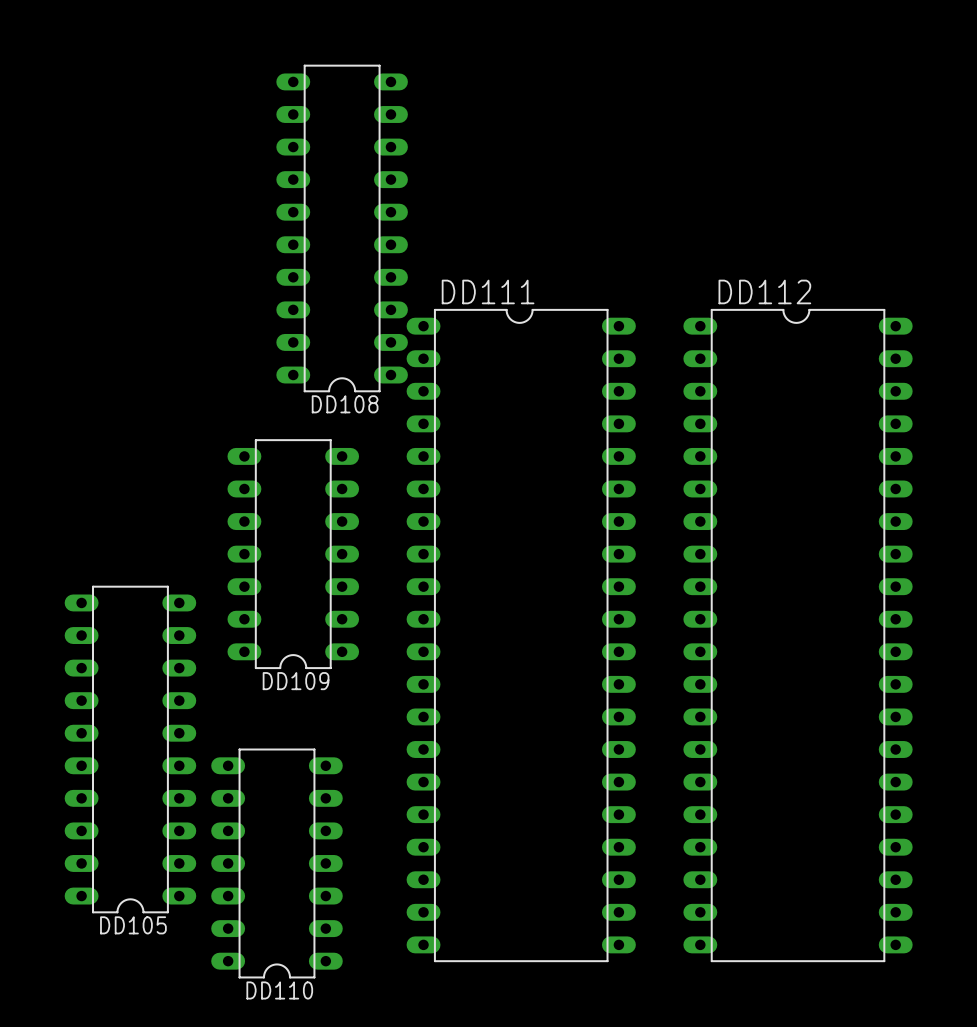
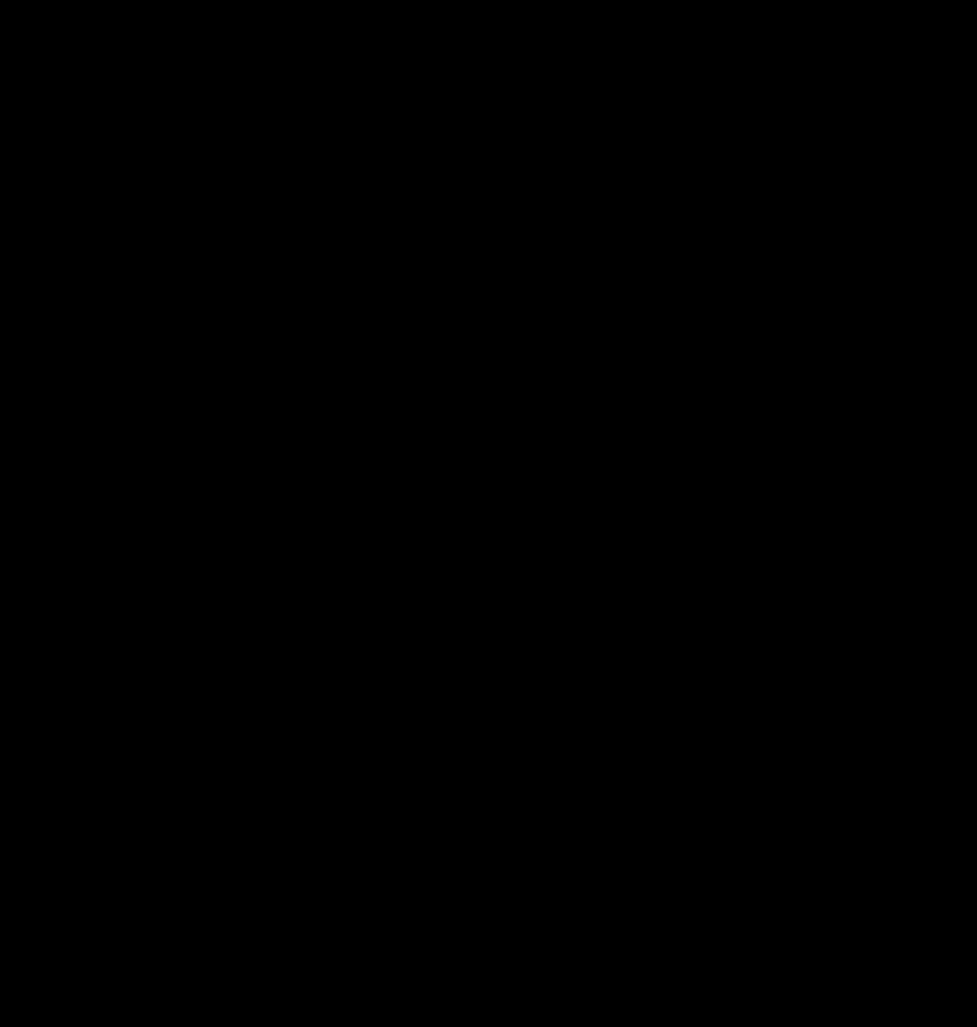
DD108: (342, 228) -> none
DD109: (293, 554) -> none
DD111: (521, 635) -> none
DD112: (798, 635) -> none
DD105: (130, 749) -> none
DD110: (276, 863) -> none

